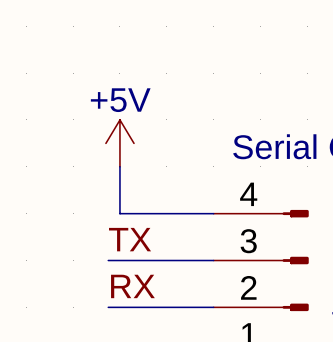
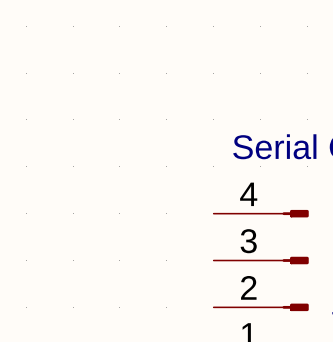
power symbol: +5V (119, 143) -> none
wire: (119, 166) (119, 213) (213, 213) -> none
label: TX (130, 239) -> none
wire: (108, 260) (213, 260) -> none
label: RX (132, 286) -> none
wire: (108, 307) (213, 307) -> none

